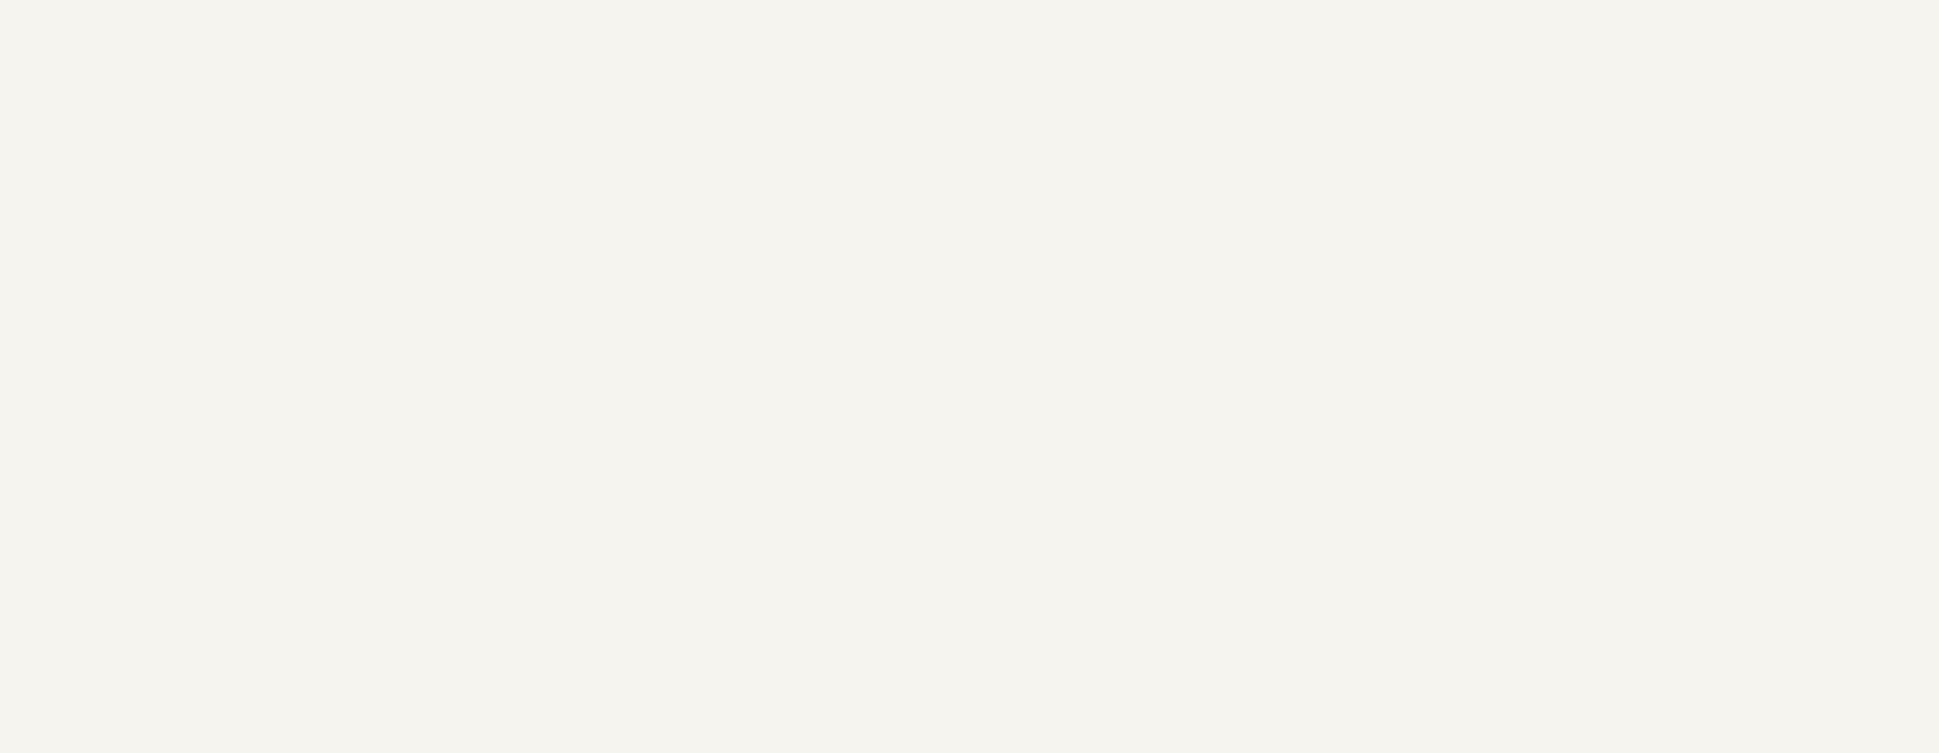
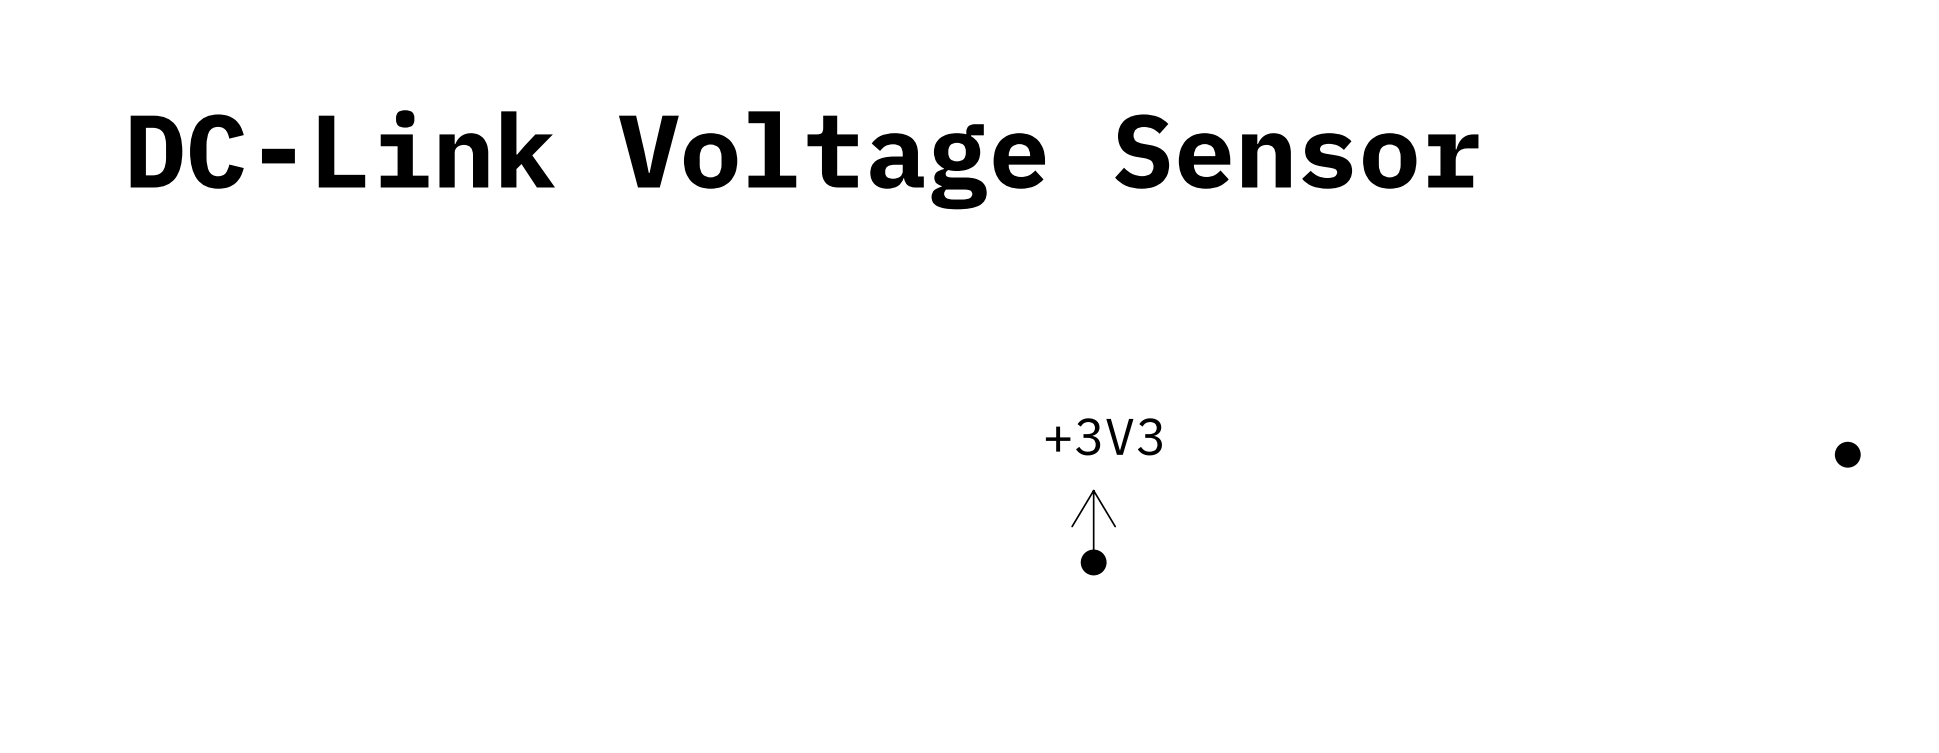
text: none -> DC-Link Voltage Sensor (804, 159)
junction: none -> (1847, 454)
power symbol: none -> +3V3 (1093, 526)
junction: none -> (1093, 562)

